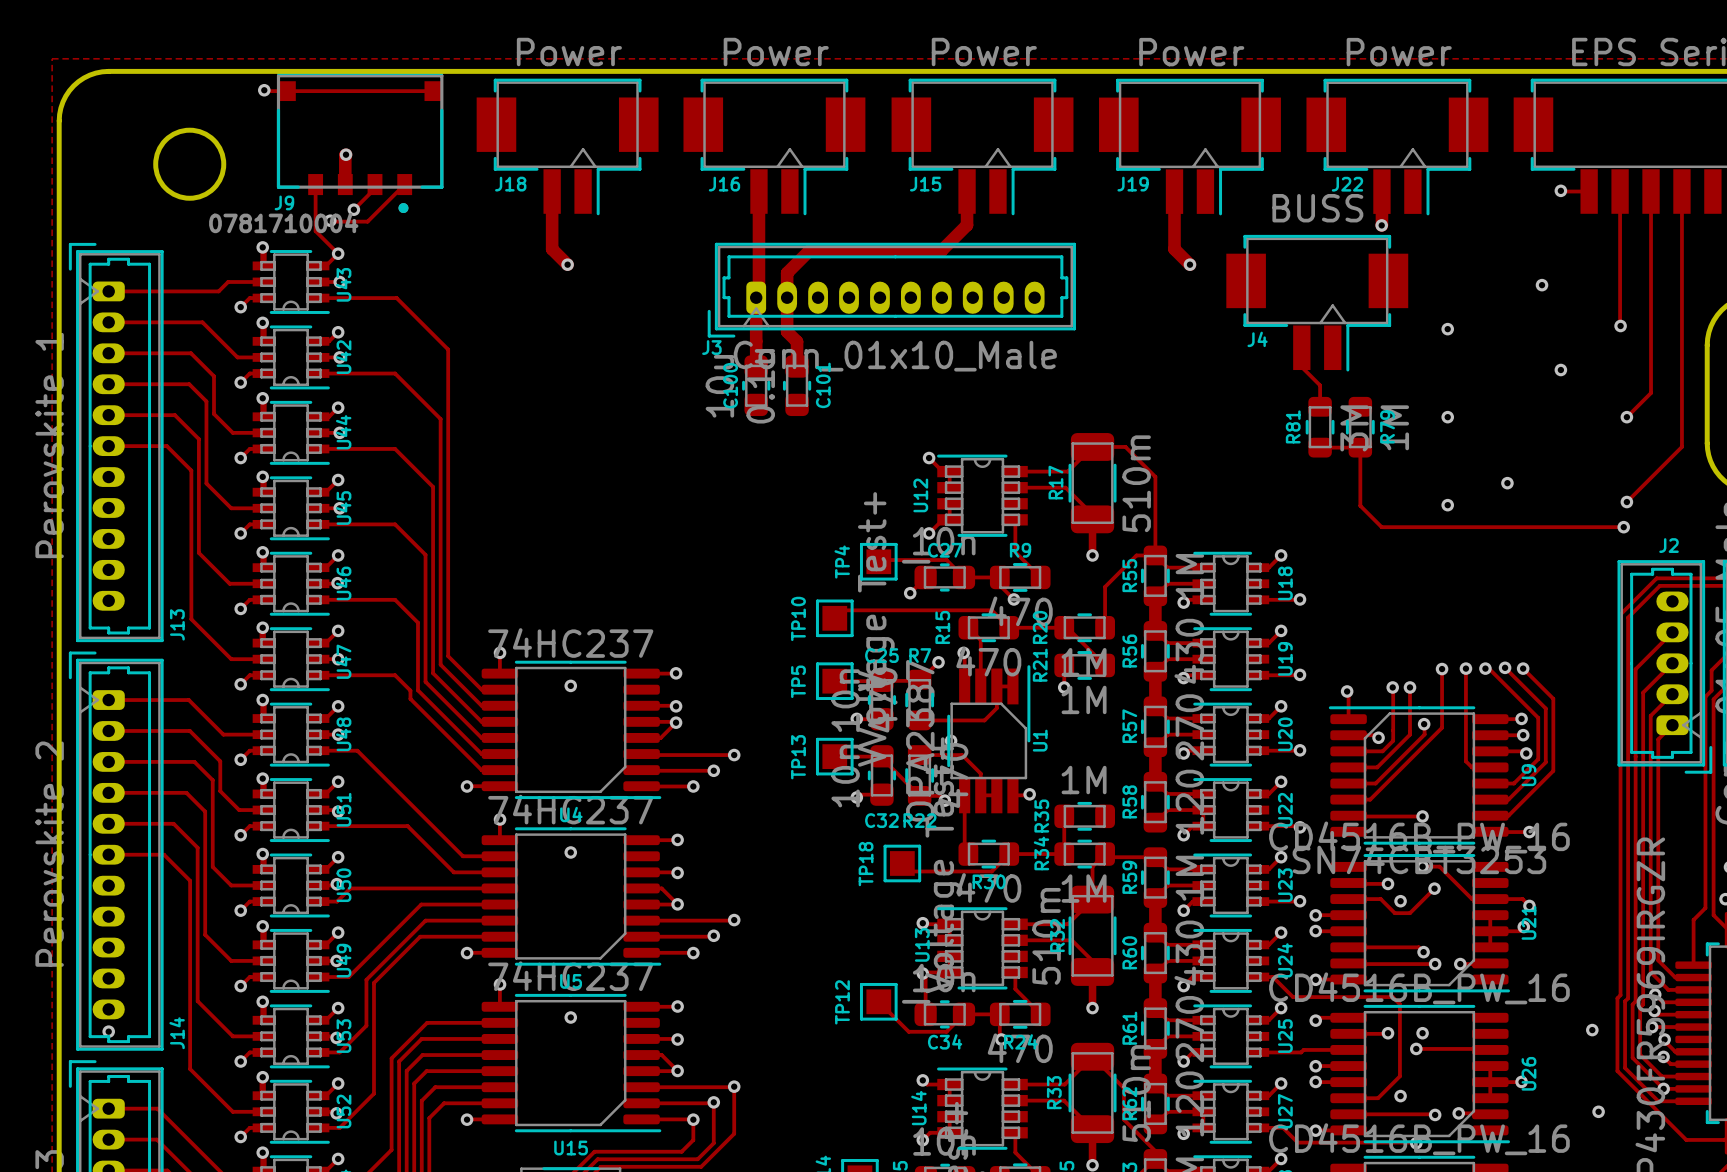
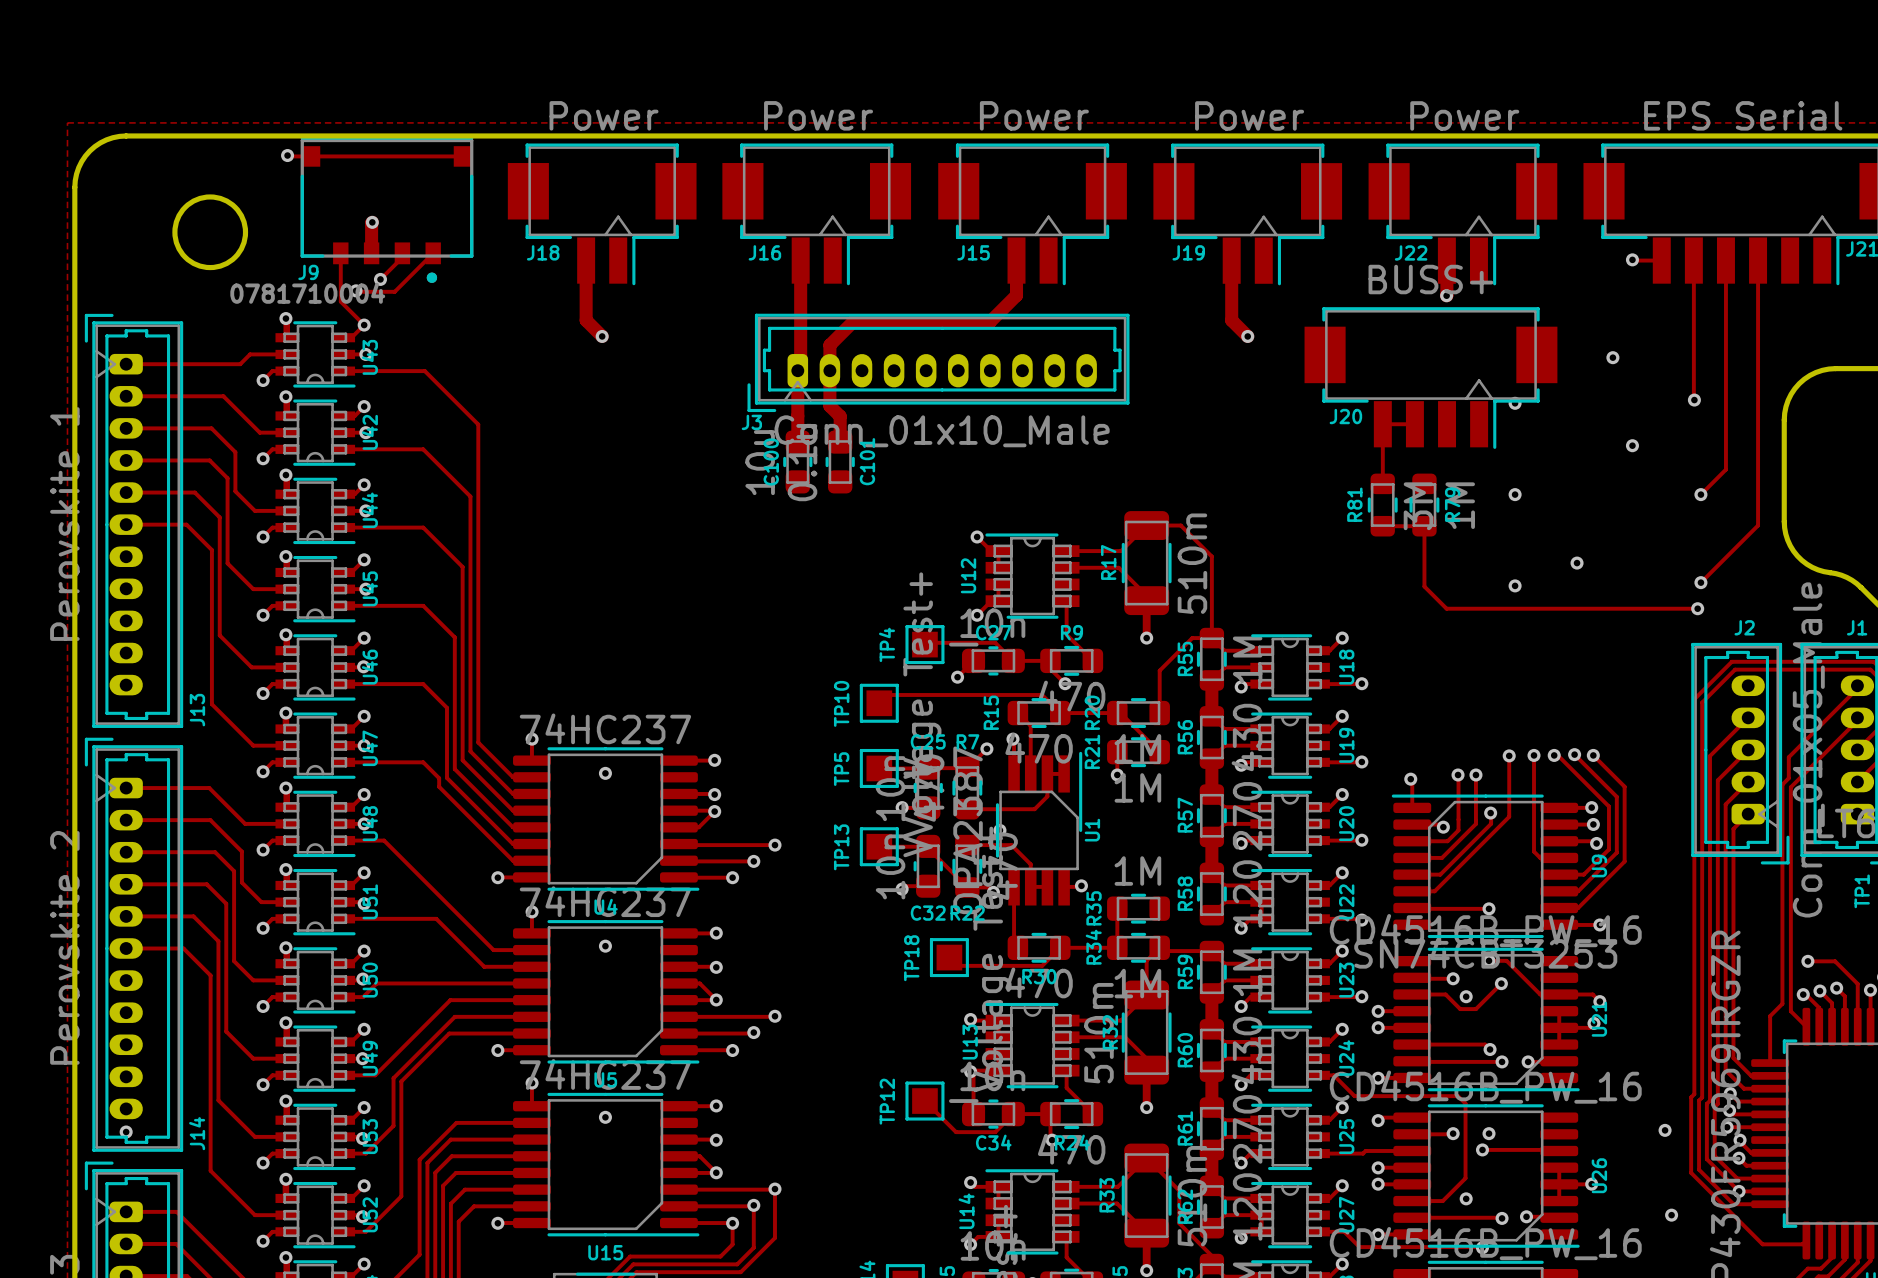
J4: BUSS (1317, 303) -> none
J20: none -> BUSS+ (1430, 378)
track: (1301, 347) (1301, 367) (1320, 385) (1320, 406) -> (1414, 424) (1382, 424) (1382, 483)

